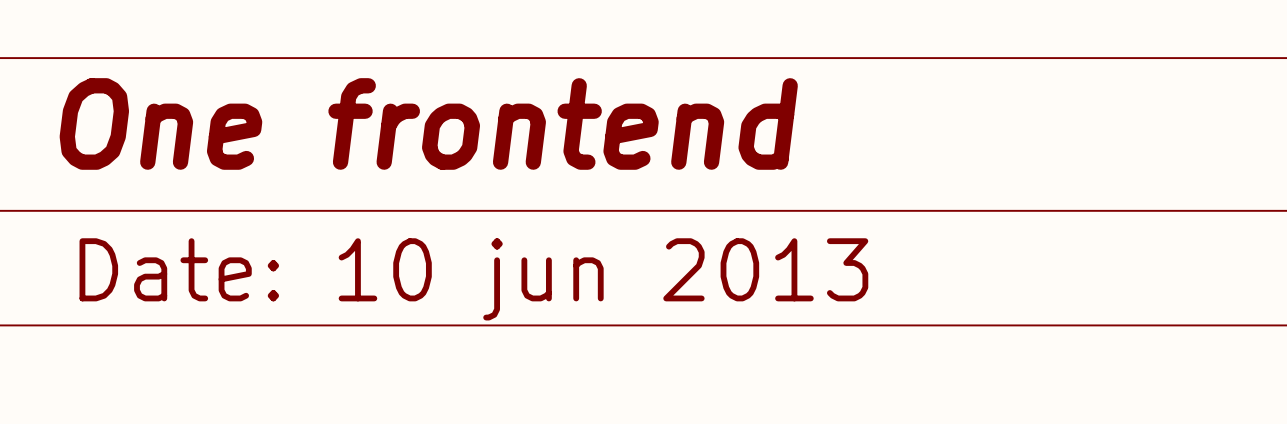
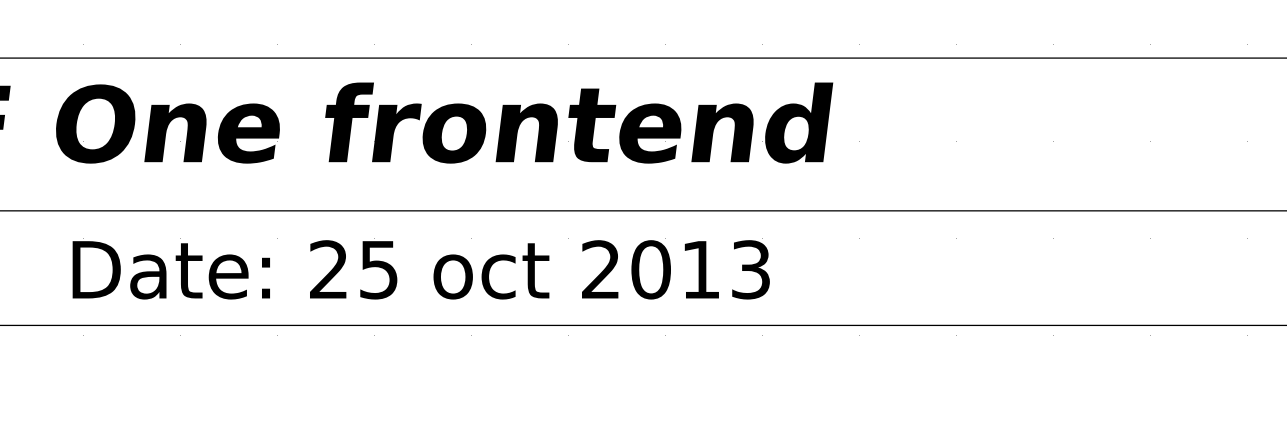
title block: Date: 10 jun 2013 (473, 279) -> Date: 25 oct 2013 (421, 269)

